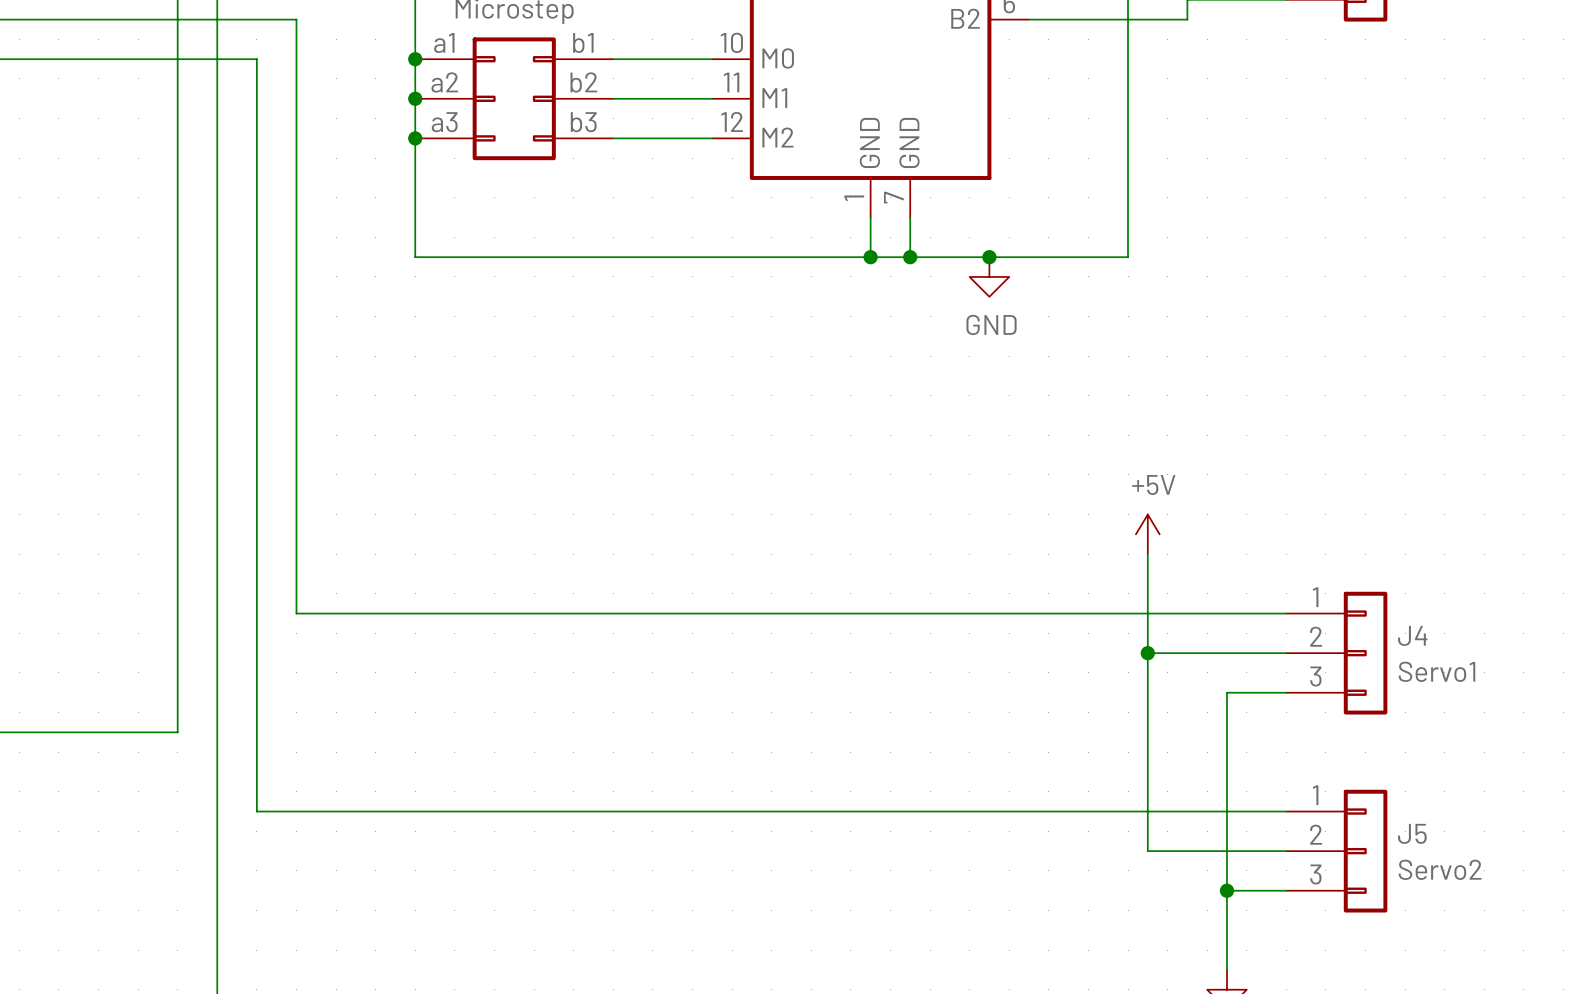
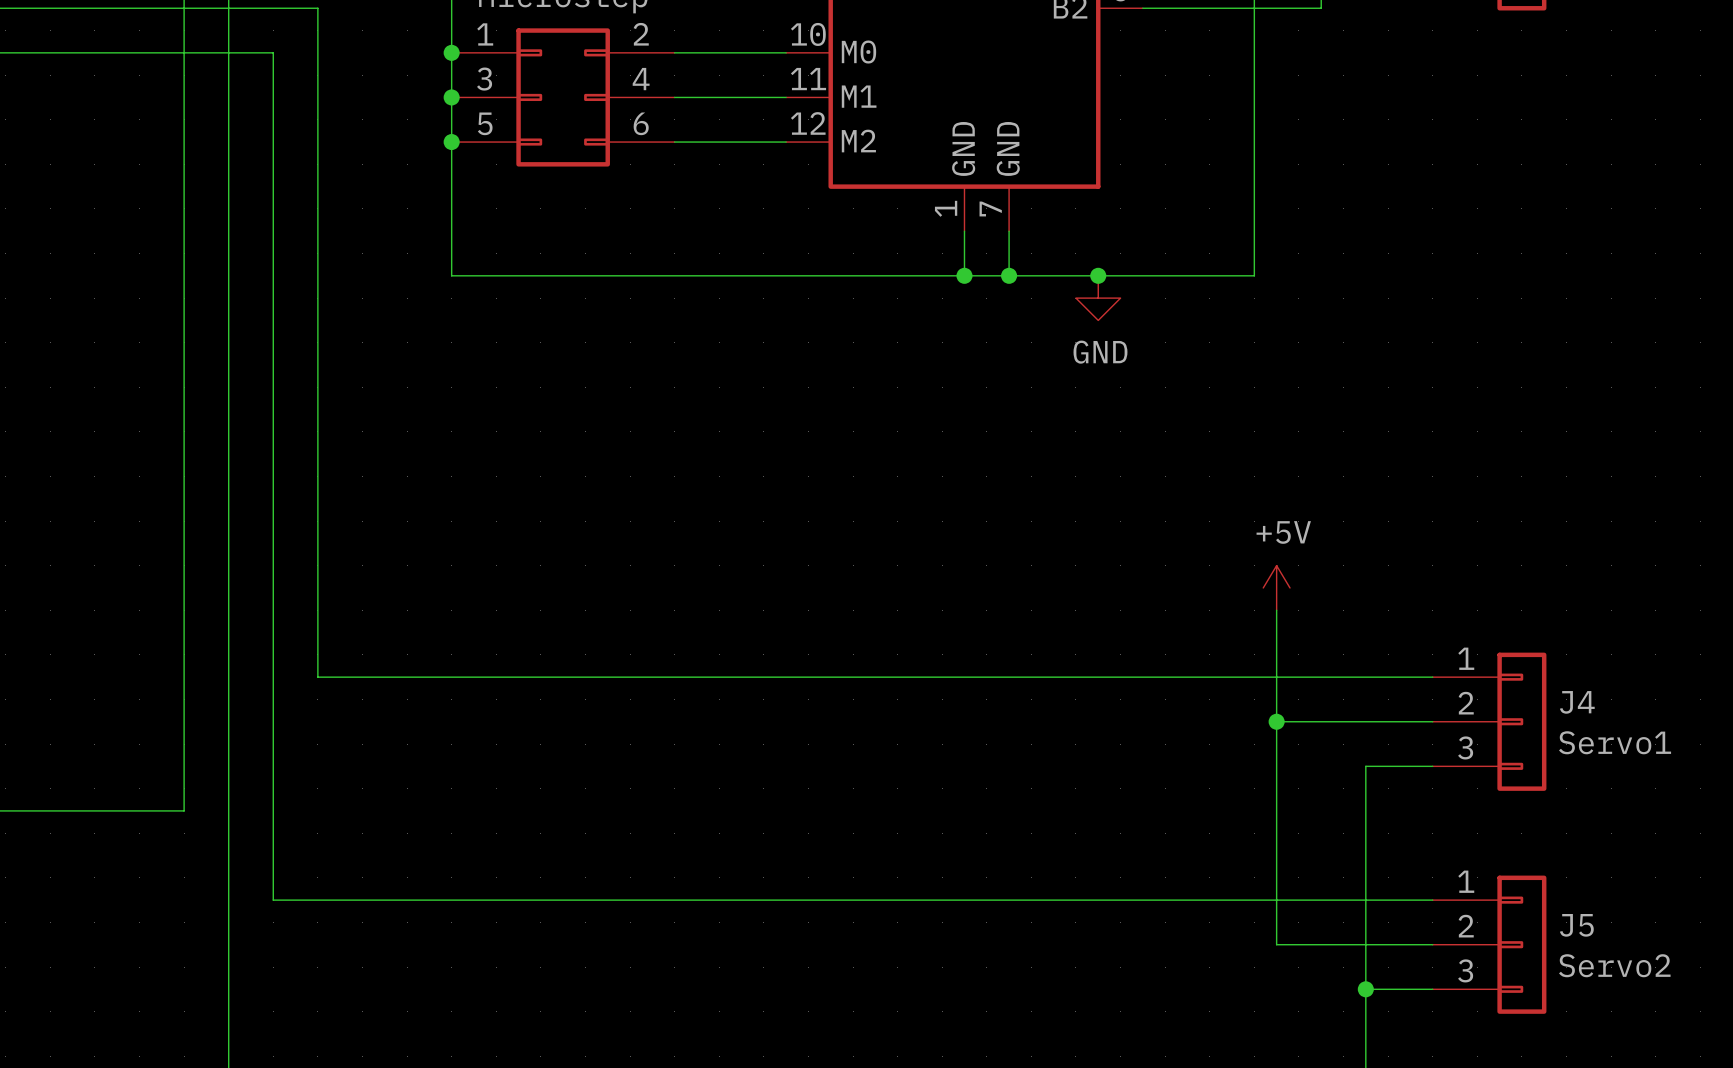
part pin number: a1 (444, 42) -> 1 (485, 34)
part pin number: b1 (583, 42) -> 2 (641, 34)
part pin number: a2 (444, 82) -> 3 (484, 79)
part pin number: b2 (583, 82) -> 4 (641, 79)
part pin number: a3 (444, 122) -> 5 (485, 123)
part pin number: b3 (583, 122) -> 6 (641, 123)

